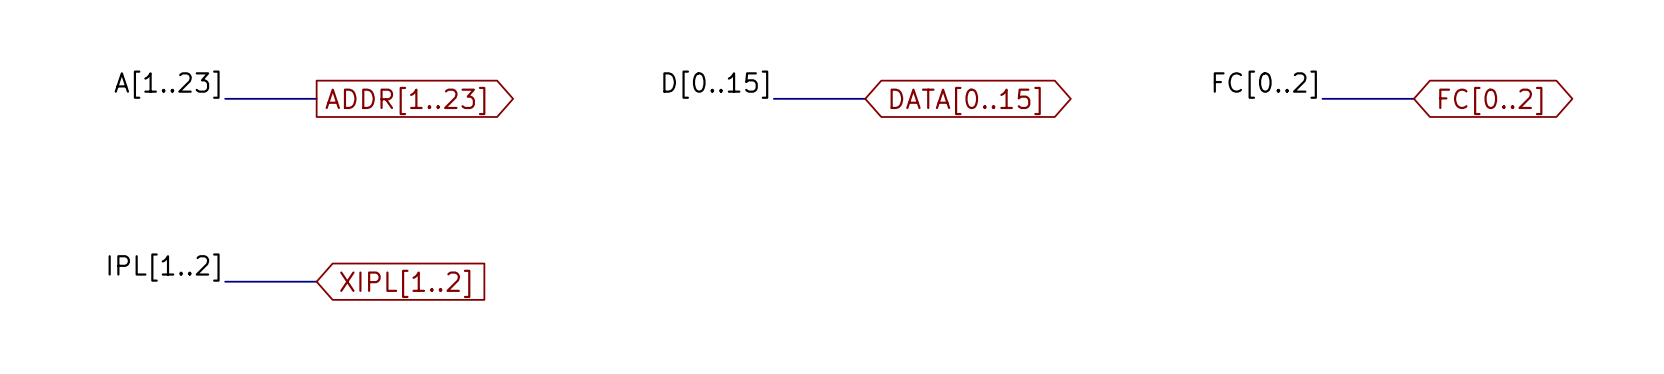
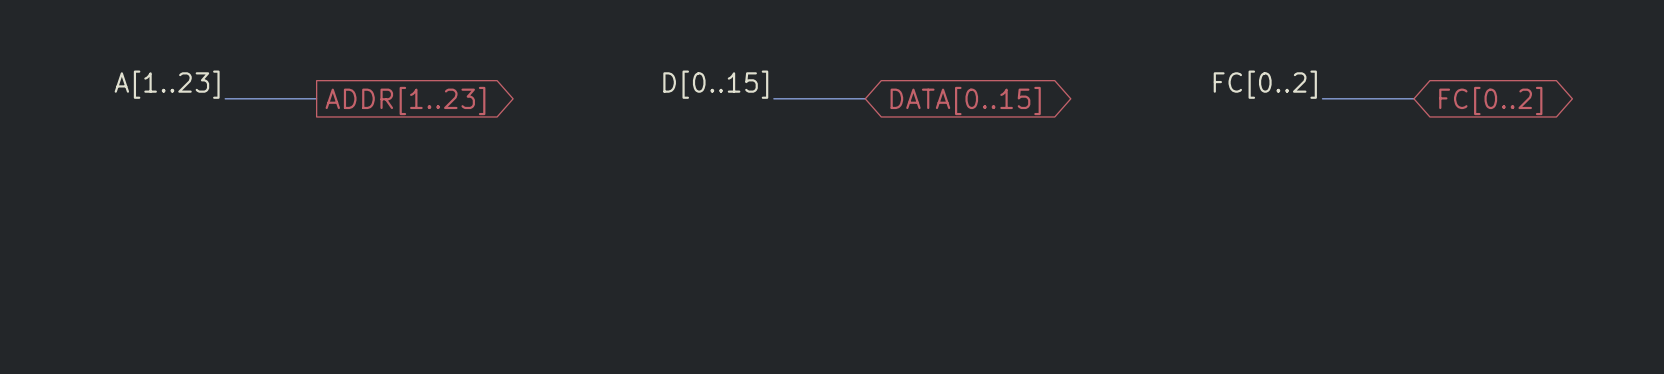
label: IPL[1..2] (164, 267) -> none
bus: (225, 281) (316, 281) -> none
global label: XIPL[1..2] (405, 283) -> none

